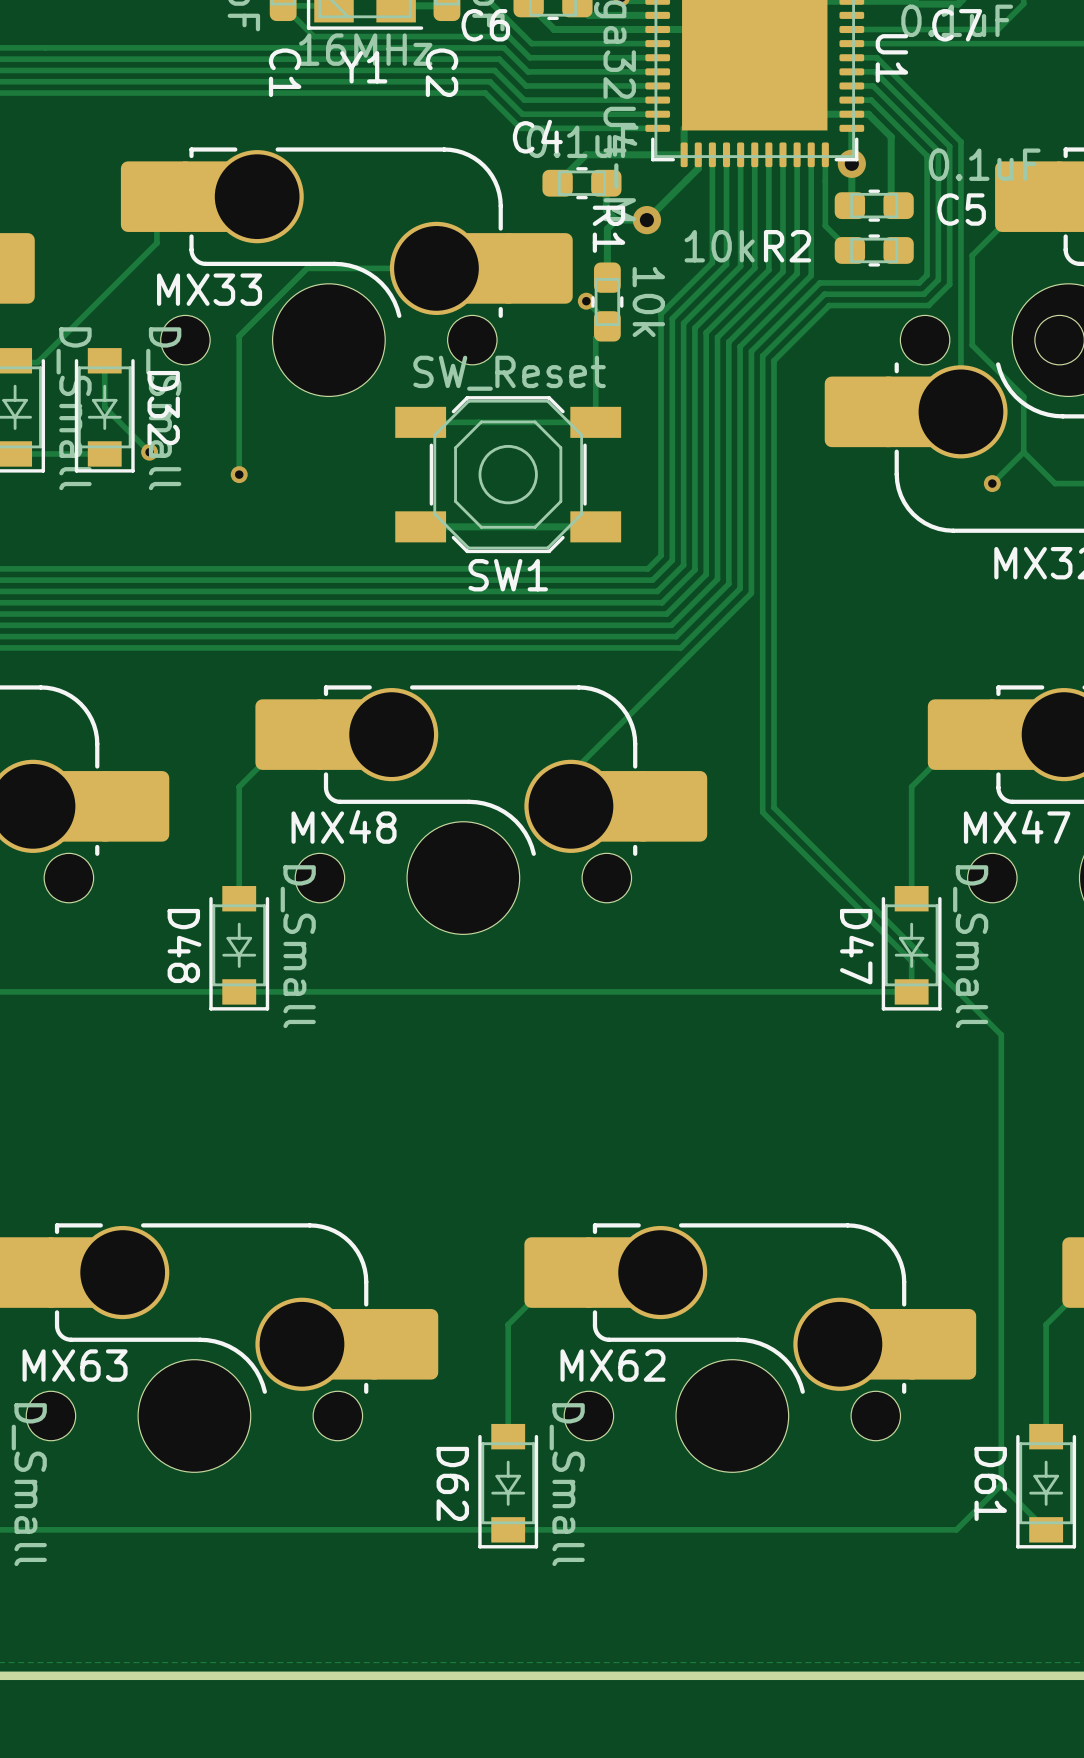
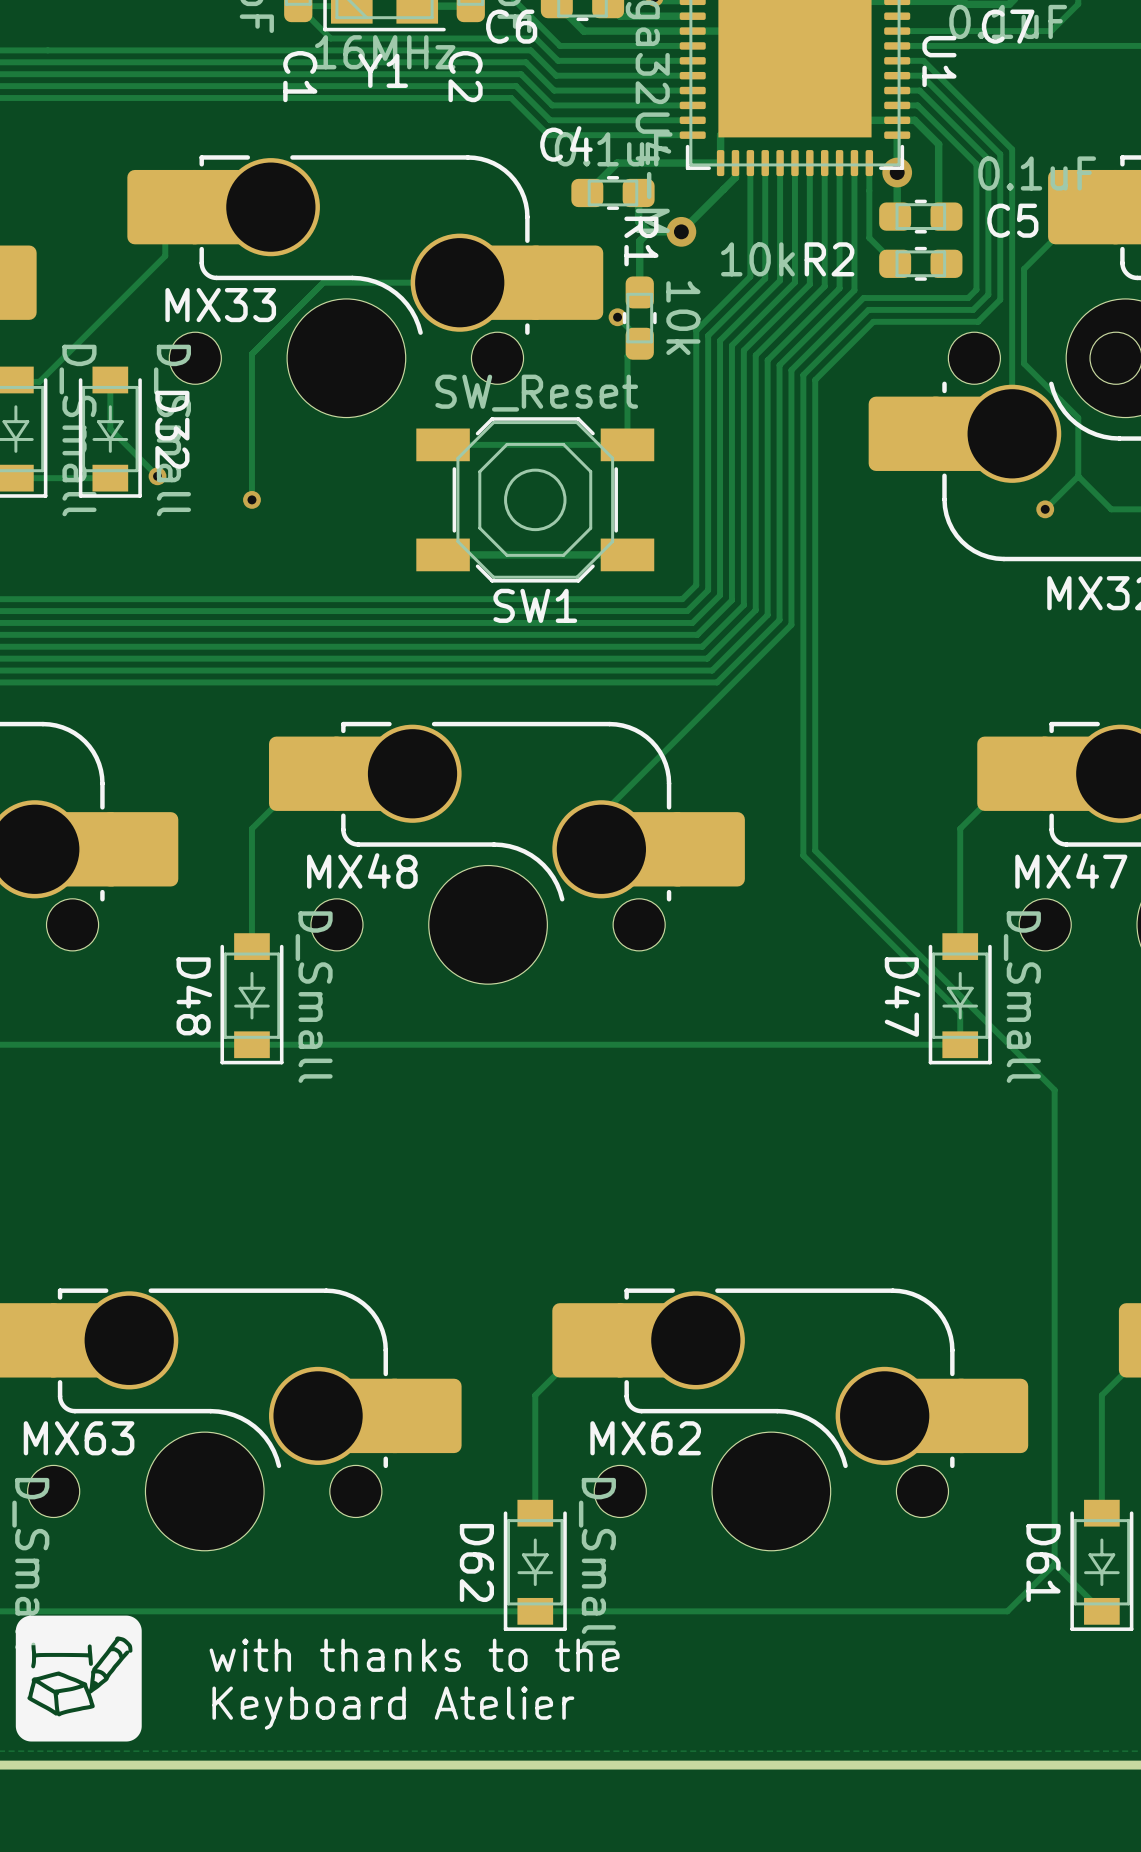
drawing: none -> [15, 1615, 142, 1742]
text: none -> with thanks to the (414, 1655)
text: none -> Keyboard Atelier (393, 1708)

